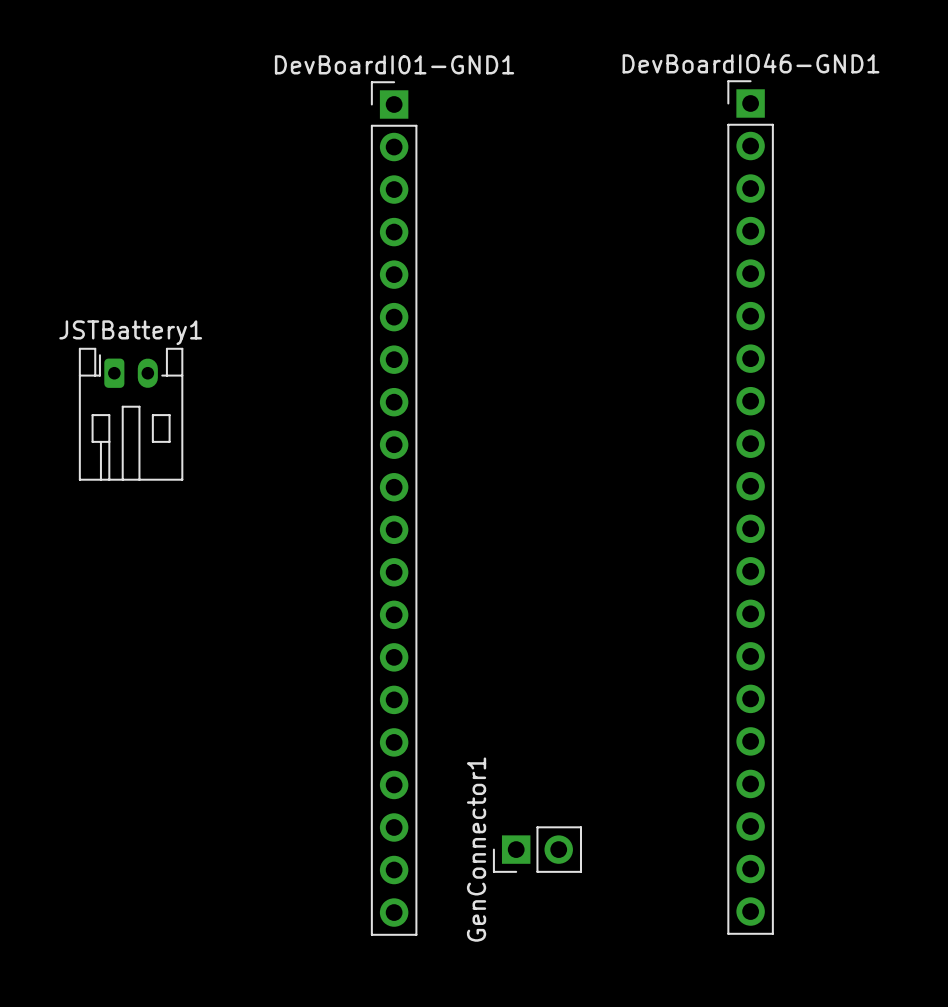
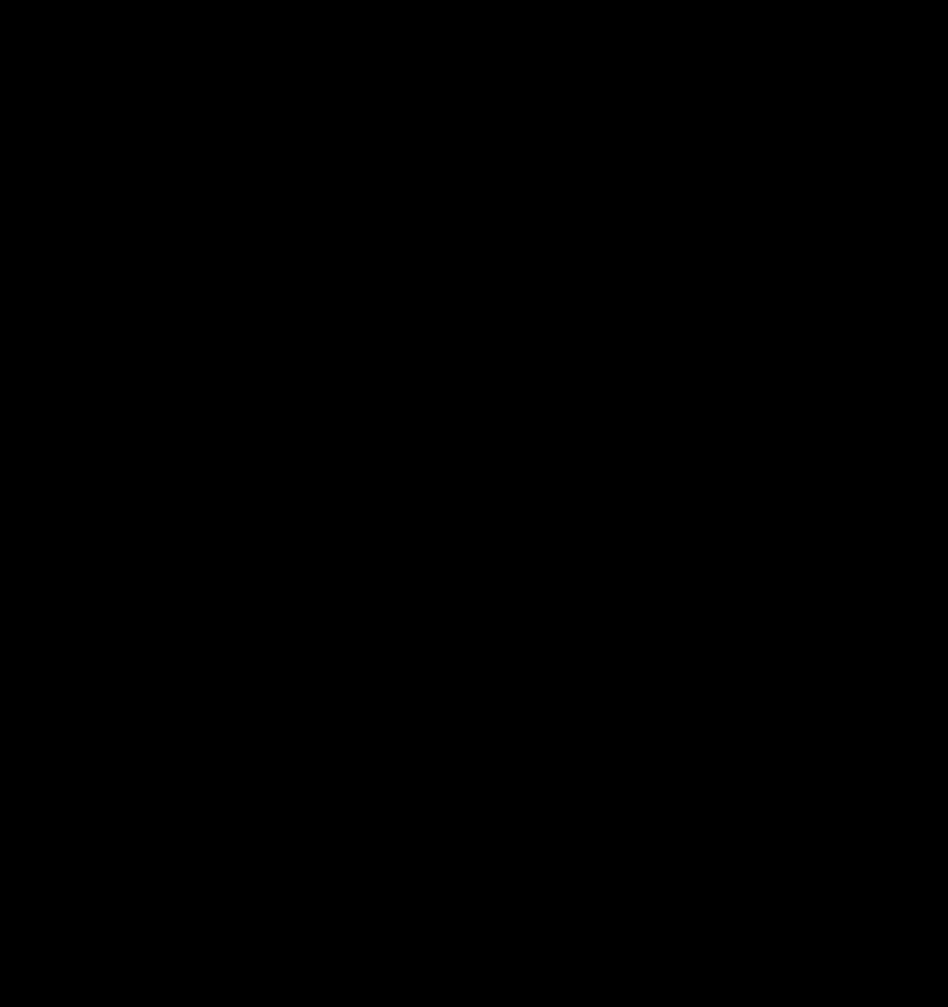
JSTBattery1: (131, 414) -> none
DevBoardIO46-GND1: (750, 507) -> none
DevBoardI01-GND1: (394, 508) -> none
GenConnector1: (537, 849) -> none

